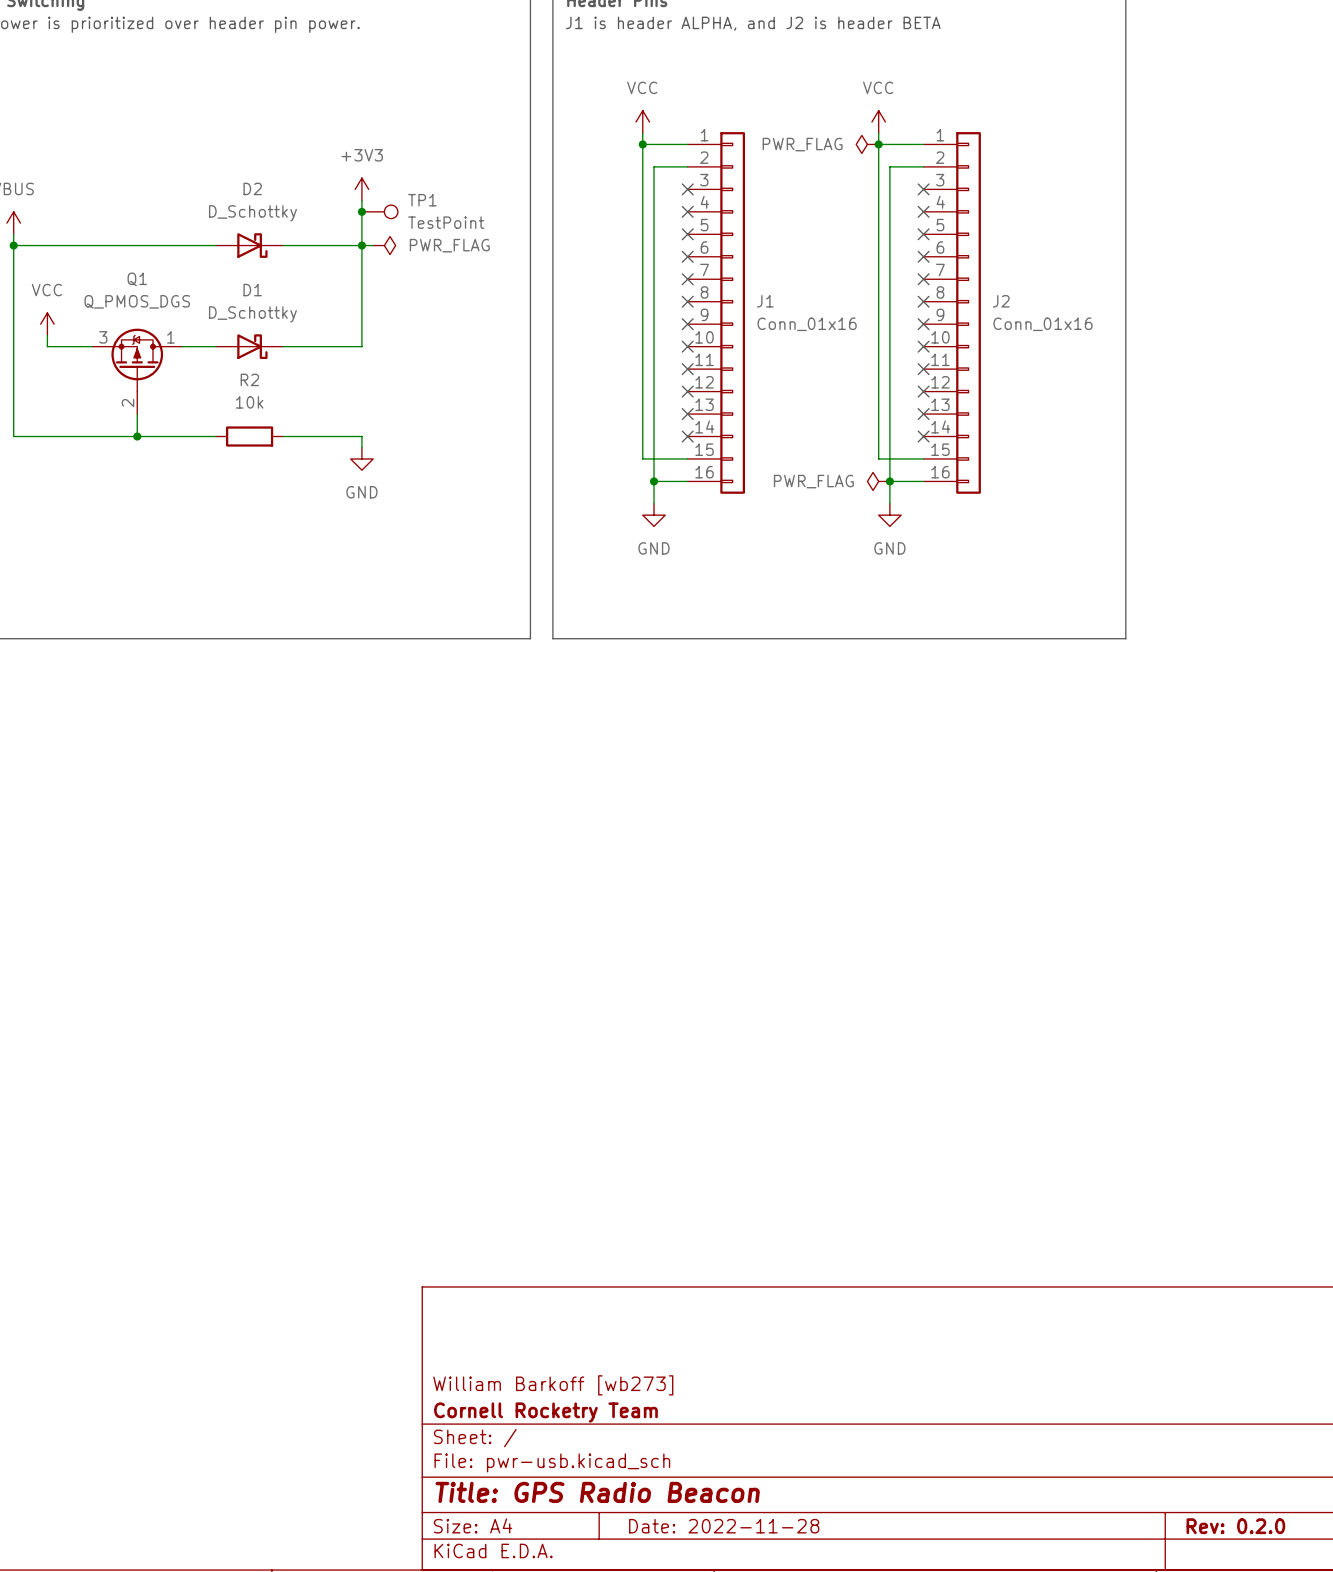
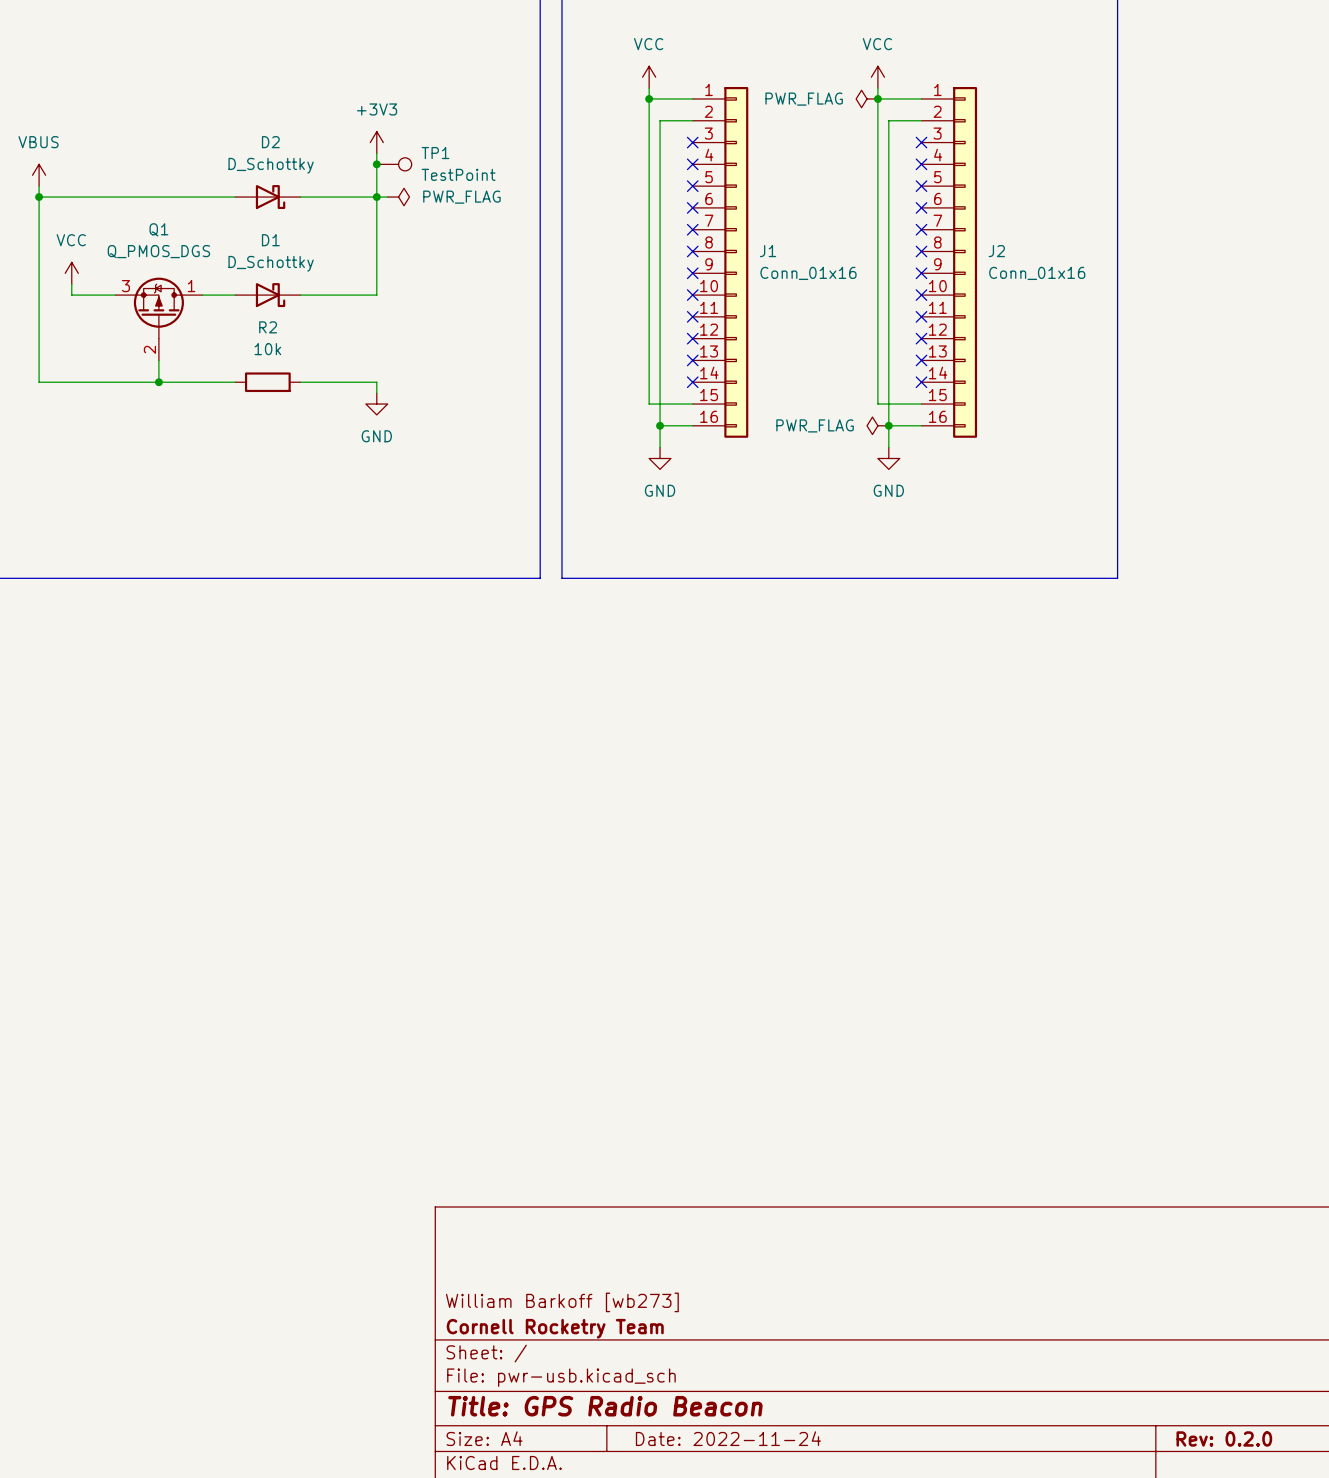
title block: Date: 2022-11-28 (724, 1526) -> Date: 2022-11-24 (728, 1438)

